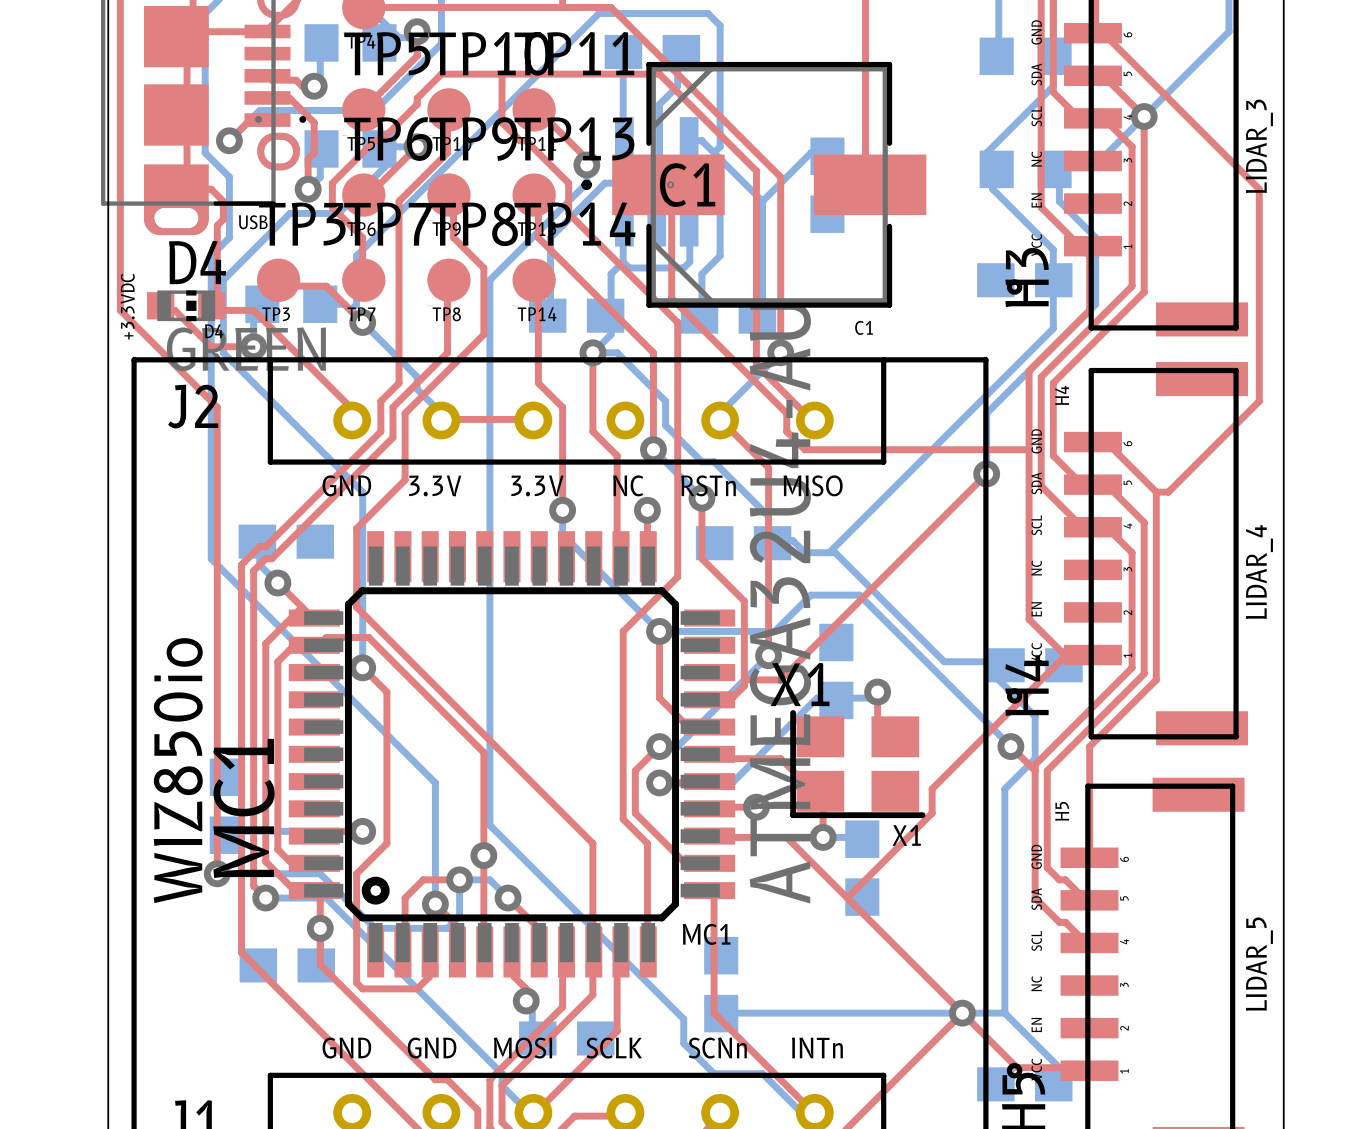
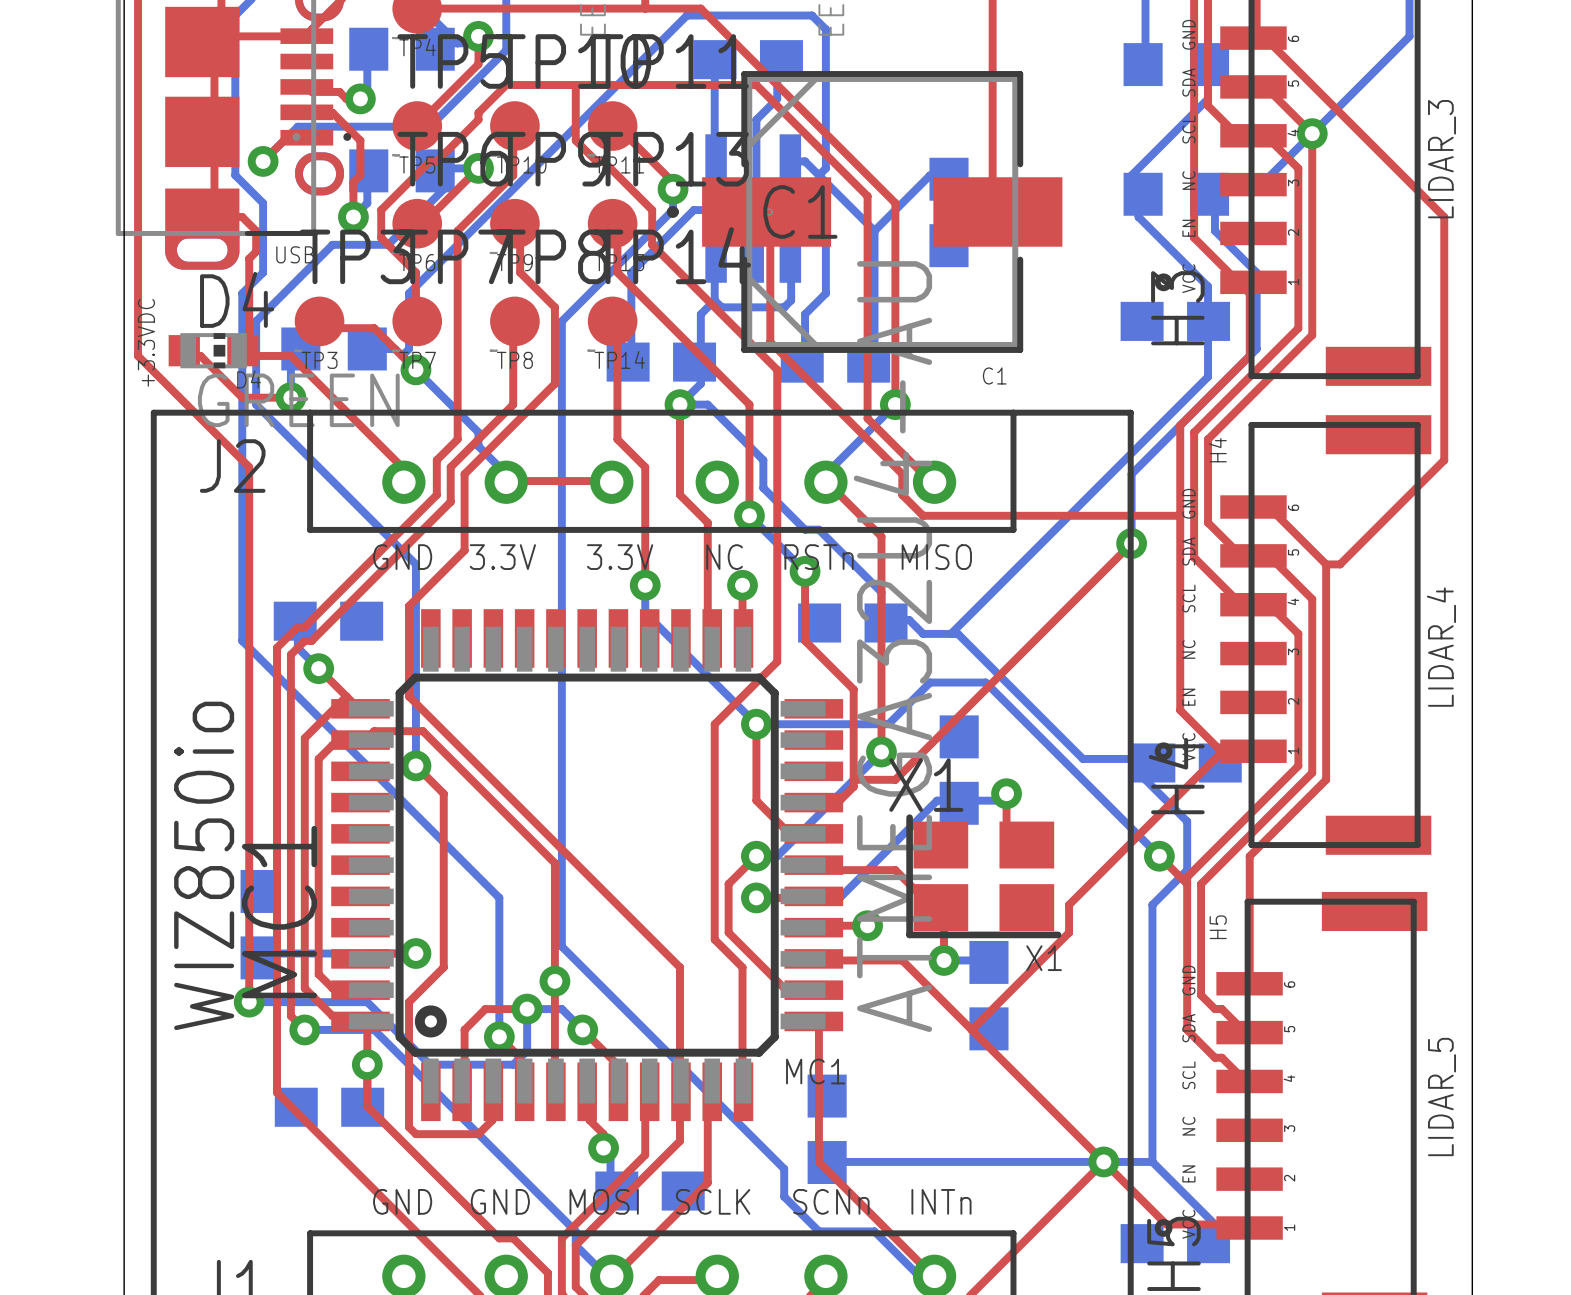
drawing position: (1014, 287) -> (1163, 282)
drawing position: (1014, 695) -> (1163, 751)

